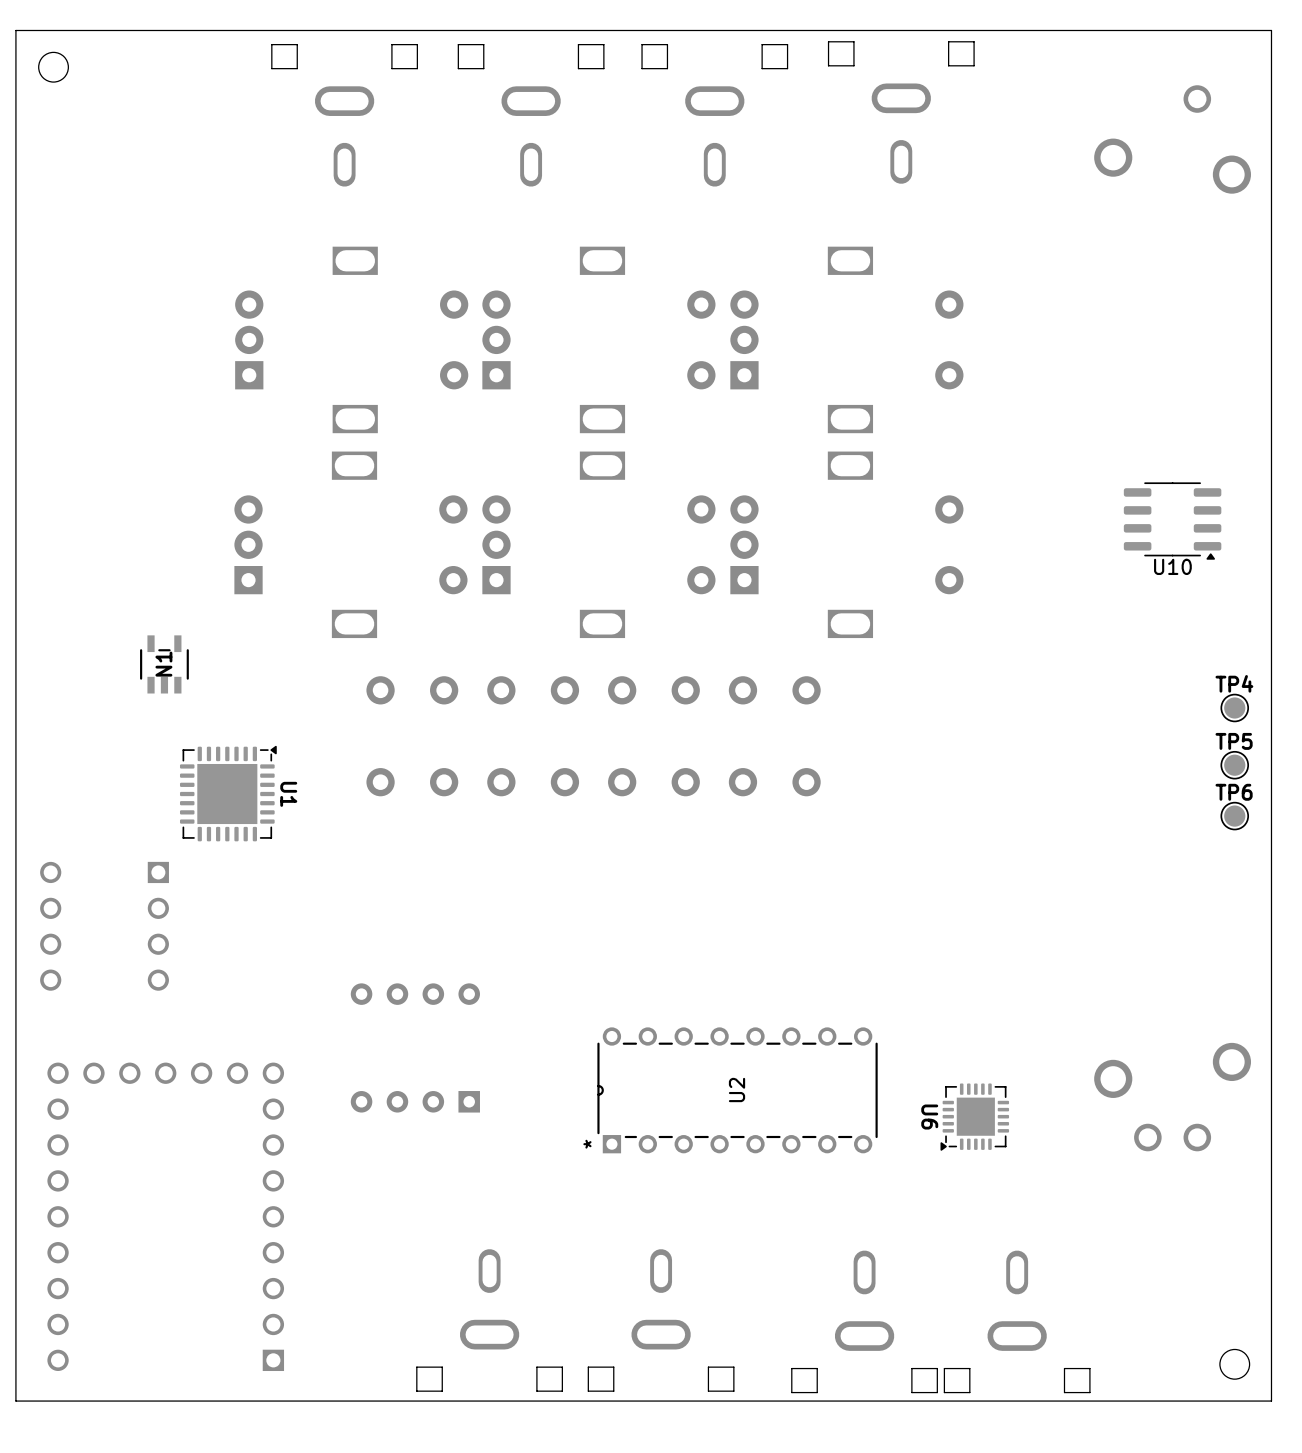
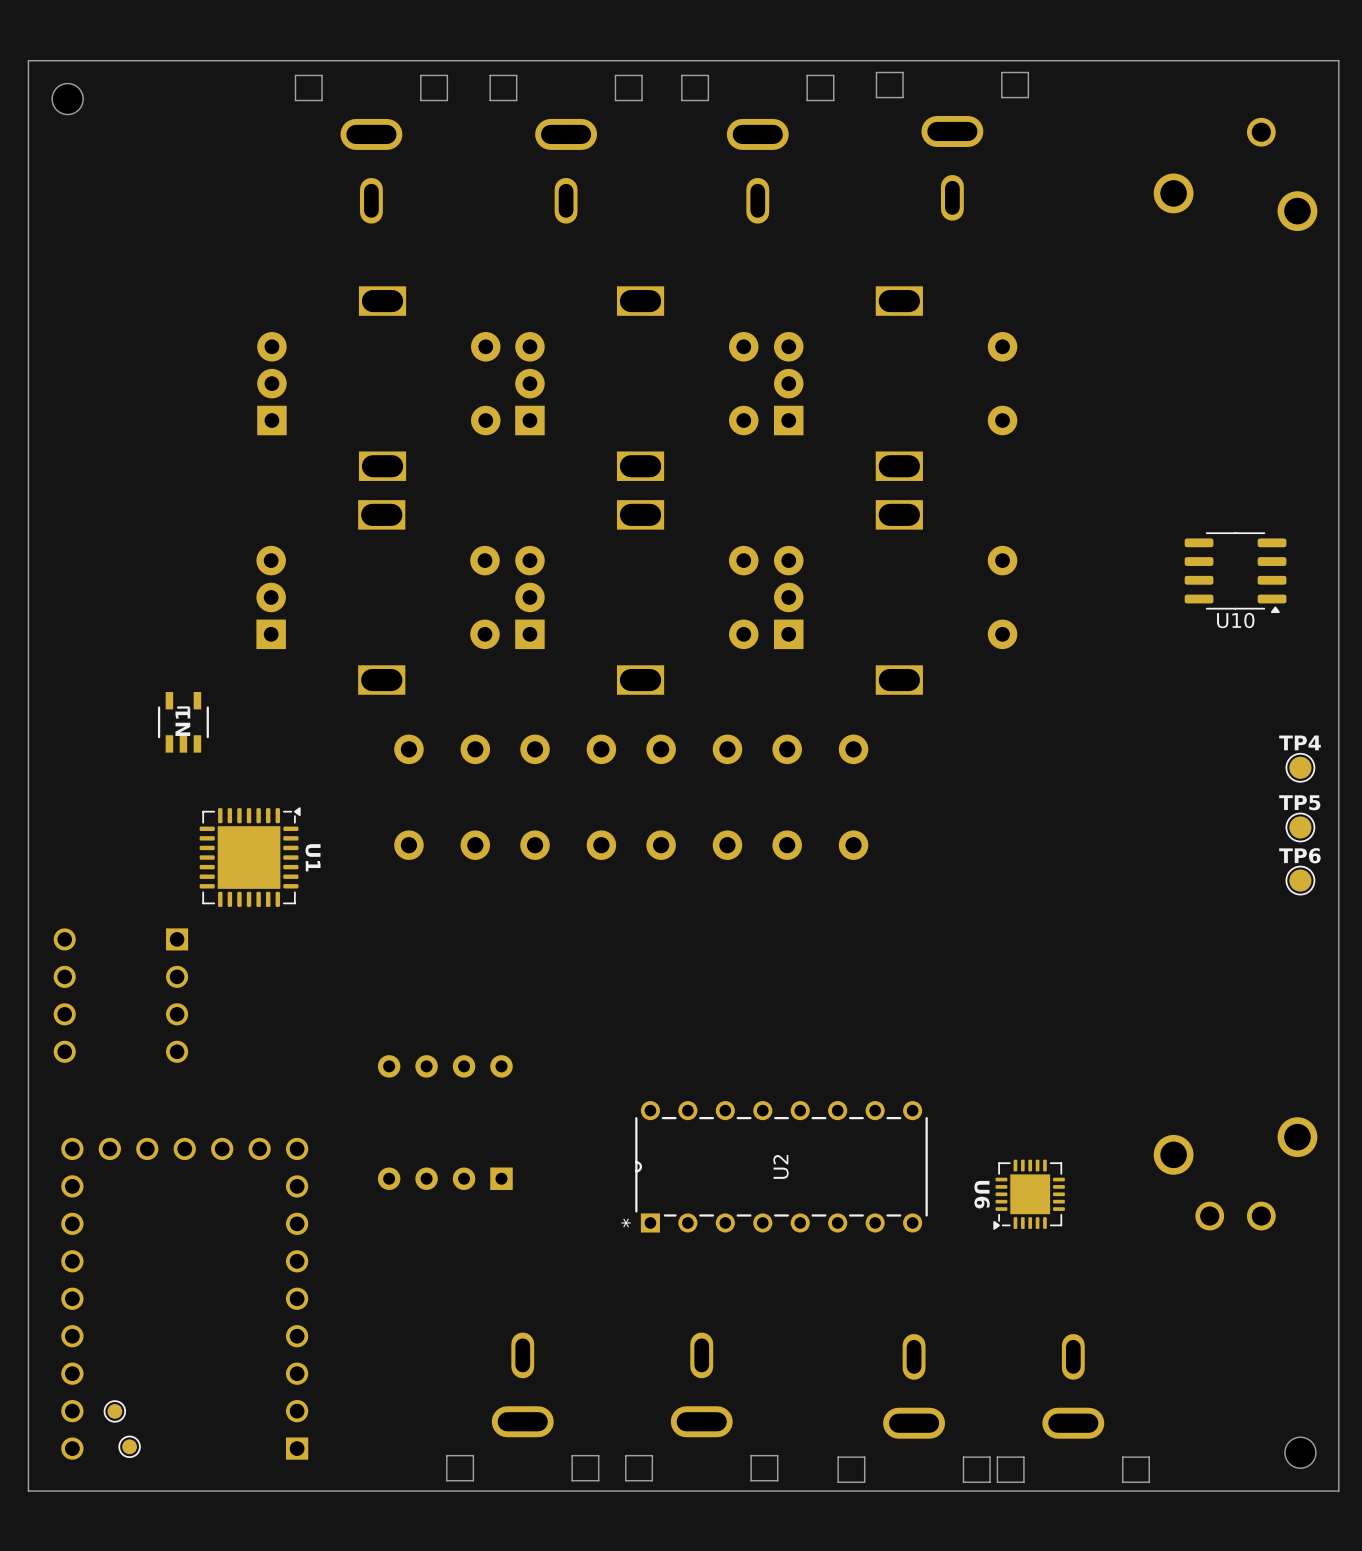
part: none -> (114, 1411)
part: none -> (129, 1446)

